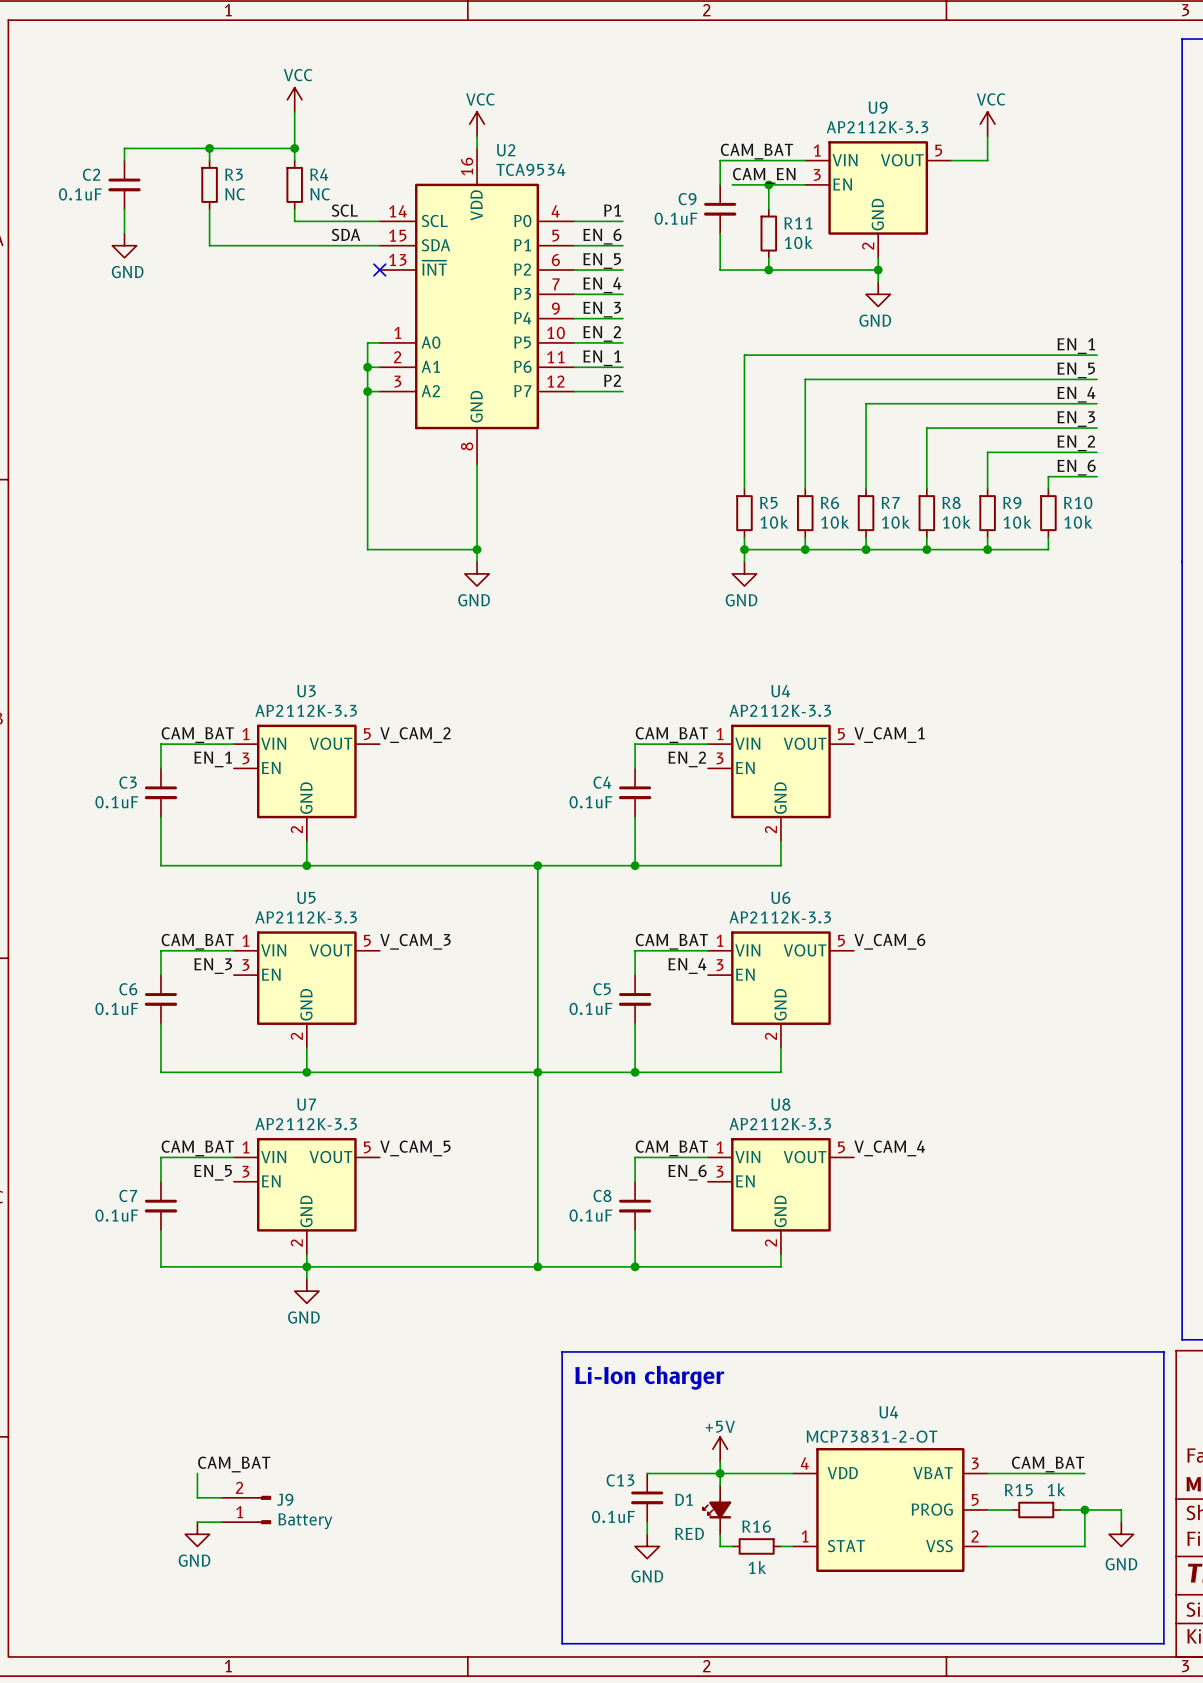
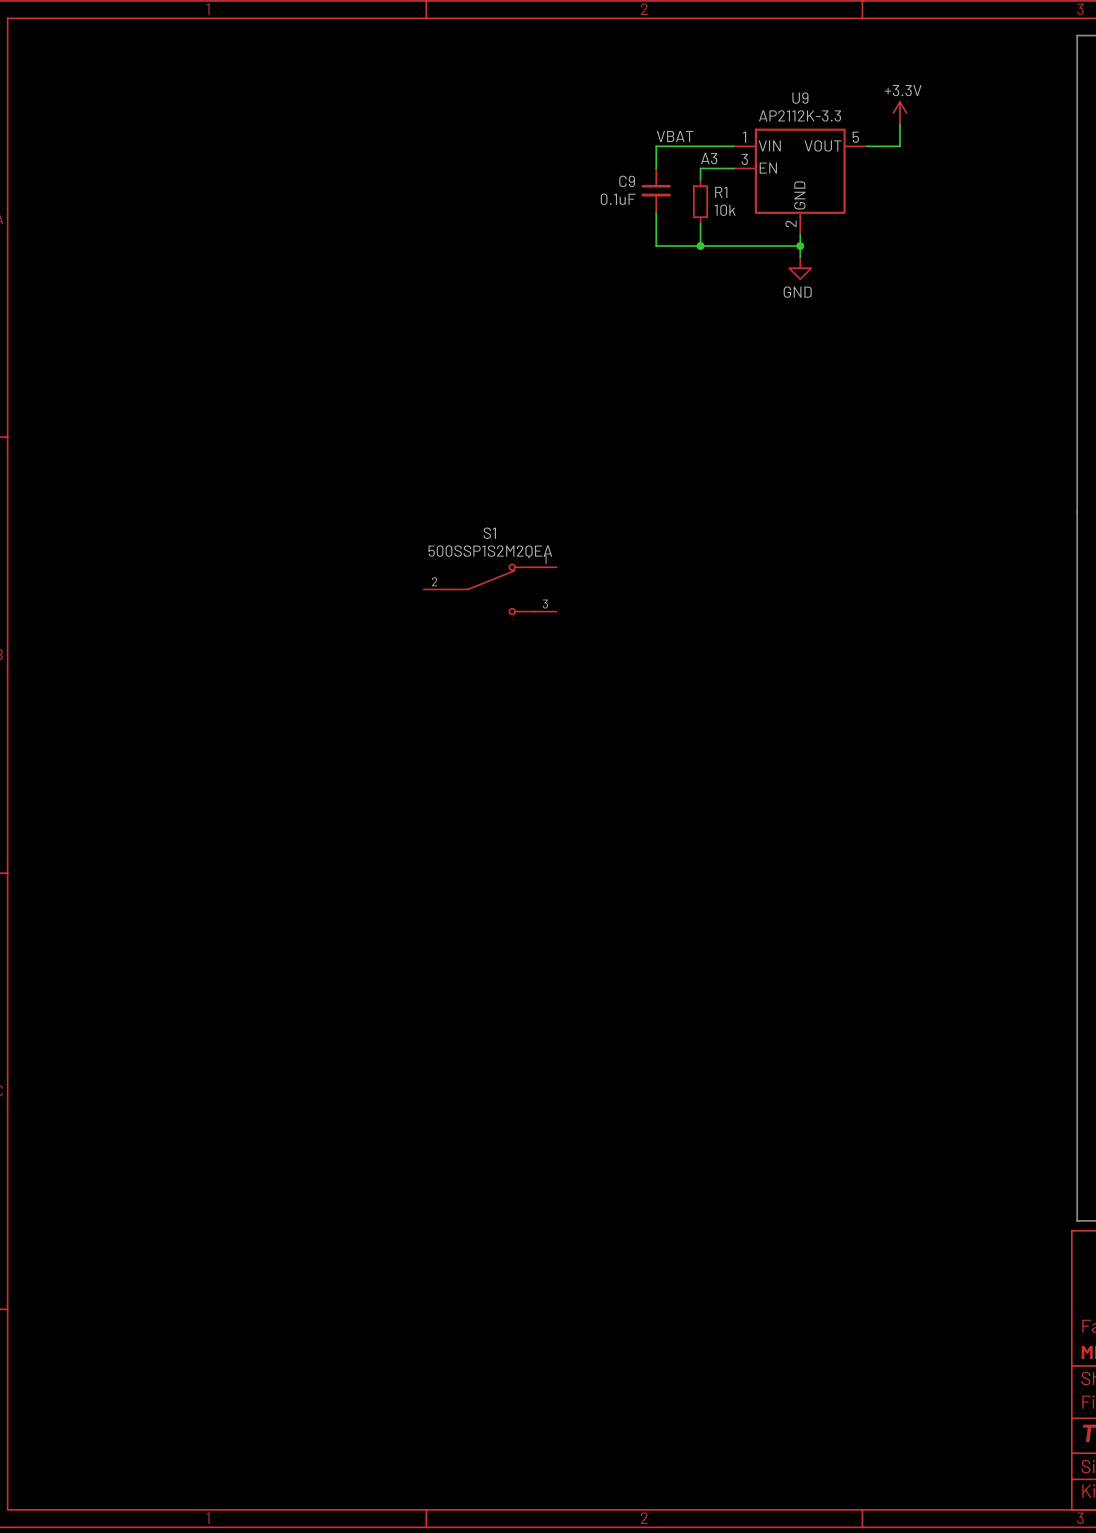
power symbol: VCC (294, 99) -> none
wire: (294, 111) (294, 160) -> none
power symbol: VCC (477, 124) -> none
power symbol: VCC (987, 124) -> +3.3V (899, 113)
wire: (477, 136) (477, 148) -> none
wire: (209, 148) (209, 160) -> none
junction: (209, 148) -> none
wire: (294, 148) (124, 148) (124, 160) -> none
junction: (294, 148) -> none
label: CAM_BAT (756, 151) -> VBAT (675, 136)
label: none -> A3 (709, 158)
label: CAM_EN (764, 175) -> none
C2: 0.1uF (124, 184) -> none
R3: NC (209, 184) -> none
R4: NC (294, 184) -> none
wire: (732, 184) (768, 184) -> none
junction: (768, 184) -> none
wire: (124, 209) (124, 233) -> none
wire: (209, 209) (209, 245) (379, 245) -> none
wire: (294, 209) (294, 221) (379, 221) -> none
label: SCL (344, 210) -> none
label: P1 (612, 210) -> none
wire: (574, 221) (622, 221) -> none
R1: none -> 10k (700, 201)
R11: 10k (768, 233) -> none
label: SDA (346, 234) -> none
label: EN_6 (602, 236) -> none
power symbol: GND (124, 245) -> none
wire: (574, 245) (622, 245) -> none
label: EN_5 (602, 260) -> none
no-connect mark: (379, 270) -> none
wire: (574, 270) (622, 270) -> none
label: EN_4 (602, 285) -> none
wire: (574, 294) (622, 294) -> none
U2: TCA9534 (477, 306) -> none
label: EN_3 (602, 309) -> none
wire: (574, 318) (622, 318) -> none
label: EN_2 (602, 333) -> none
wire: (379, 342) (367, 342) (367, 549) (477, 549) -> none
wire: (574, 342) (622, 342) -> none
label: EN_1 (1076, 346) -> none
wire: (1097, 355) (744, 355) (744, 488) -> none
label: EN_1 (602, 358) -> none
wire: (367, 367) (379, 367) -> none
junction: (367, 367) -> none
wire: (574, 367) (622, 367) -> none
label: EN_5 (1076, 370) -> none
wire: (1097, 379) (805, 379) (805, 488) -> none
label: P2 (612, 380) -> none
wire: (367, 391) (379, 391) -> none
junction: (367, 391) -> none
wire: (574, 391) (622, 391) -> none
label: EN_4 (1076, 394) -> none
wire: (1097, 403) (866, 403) (866, 488) -> none
label: EN_3 (1076, 419) -> none
wire: (1097, 428) (926, 428) (926, 488) -> none
label: EN_2 (1076, 443) -> none
wire: (1097, 452) (987, 452) (987, 488) -> none
wire: (477, 464) (477, 561) -> none
label: EN_6 (1076, 467) -> none
wire: (1097, 476) (1048, 476) (1048, 488) -> none
R5: 10k (744, 513) -> none
R6: 10k (805, 513) -> none
R7: 10k (866, 513) -> none
R8: 10k (926, 513) -> none
R9: 10k (987, 513) -> none
R10: 10k (1048, 513) -> none
wire: (744, 537) (744, 561) -> none
wire: (805, 537) (805, 549) -> none
wire: (866, 537) (866, 549) -> none
wire: (926, 537) (926, 549) -> none
wire: (987, 537) (987, 549) -> none
wire: (1048, 537) (1048, 549) (744, 549) -> none
junction: (477, 549) -> none
junction: (744, 549) -> none
junction: (805, 549) -> none
junction: (866, 549) -> none
junction: (926, 549) -> none
junction: (987, 549) -> none
power symbol: GND (477, 573) -> none
power symbol: GND (744, 573) -> none
S1: none -> 500SSP1S2M2QEA (490, 589)
label: CAM_BAT (197, 735) -> none
label: V_CAM_2 (415, 735) -> none
label: CAM_BAT (671, 735) -> none
label: V_CAM_1 (889, 735) -> none
wire: (233, 744) (160, 744) (160, 768) -> none
wire: (708, 744) (635, 744) (635, 768) -> none
label: EN_1 (213, 759) -> none
label: EN_2 (687, 759) -> none
U3: AP2112K-3.3 (306, 783) -> none
U4: AP2112K-3.3 (780, 783) -> none
C3: 0.1uF (160, 792) -> none
C4: 0.1uF (635, 792) -> none
wire: (160, 817) (160, 865) (780, 865) (780, 841) -> none
wire: (635, 817) (635, 865) -> none
wire: (306, 841) (306, 865) -> none
junction: (306, 865) -> none
wire: (537, 865) (537, 1266) -> none
junction: (537, 865) -> none
junction: (635, 865) -> none
label: CAM_BAT (197, 941) -> none
label: V_CAM_3 (415, 941) -> none
label: CAM_BAT (671, 941) -> none
label: V_CAM_6 (889, 941) -> none
wire: (233, 950) (160, 950) (160, 975) -> none
wire: (708, 950) (635, 950) (635, 975) -> none
label: EN_3 (213, 966) -> none
label: EN_4 (687, 966) -> none
U5: AP2112K-3.3 (306, 989) -> none
U6: AP2112K-3.3 (780, 989) -> none
C6: 0.1uF (160, 999) -> none
C5: 0.1uF (635, 999) -> none
wire: (160, 1023) (160, 1072) (780, 1072) (780, 1048) -> none
wire: (635, 1023) (635, 1072) -> none
wire: (306, 1048) (306, 1072) -> none
junction: (306, 1072) -> none
junction: (537, 1072) -> none
junction: (635, 1072) -> none
label: CAM_BAT (197, 1148) -> none
label: V_CAM_5 (415, 1148) -> none
label: CAM_BAT (671, 1148) -> none
label: V_CAM_4 (889, 1148) -> none
wire: (233, 1157) (160, 1157) (160, 1181) -> none
wire: (708, 1157) (635, 1157) (635, 1181) -> none
label: EN_5 (213, 1172) -> none
label: EN_6 (687, 1172) -> none
U7: AP2112K-3.3 (306, 1196) -> none
U8: AP2112K-3.3 (780, 1196) -> none
C7: 0.1uF (160, 1206) -> none
C8: 0.1uF (635, 1206) -> none
wire: (160, 1230) (160, 1266) (780, 1266) (780, 1254) -> none
wire: (635, 1230) (635, 1266) -> none
wire: (306, 1254) (306, 1279) -> none
junction: (306, 1266) -> none
junction: (537, 1266) -> none
junction: (635, 1266) -> none
power symbol: GND (306, 1291) -> none
line: (562, 1351) (562, 1643) (1163, 1643) (1163, 1351) (562, 1351) -> none
text: Li-Ion charger (649, 1377) -> none
power symbol: +5V (720, 1449) -> none
wire: (720, 1461) (720, 1485) -> none
label: CAM_BAT (234, 1464) -> none
label: CAM_BAT (1048, 1464) -> none
wire: (197, 1473) (197, 1497) (221, 1497) -> none
wire: (647, 1473) (793, 1473) -> none
junction: (720, 1473) -> none
wire: (987, 1473) (1084, 1473) -> none
C13: 0.1uF (647, 1497) -> none
J9: Battery (246, 1509) -> none
D1: RED (717, 1509) -> none
U4: MCP73831-2-OT (890, 1509) -> none
wire: (987, 1509) (1011, 1509) -> none
R15: 1k (1036, 1509) -> none
wire: (1060, 1509) (1121, 1509) (1121, 1522) -> none
wire: (1084, 1509) (1084, 1546) (987, 1546) -> none
junction: (1084, 1509) -> none
wire: (197, 1522) (221, 1522) -> none
wire: (647, 1522) (647, 1534) -> none
power symbol: GND (197, 1534) -> none
wire: (720, 1534) (720, 1546) (732, 1546) -> none
power symbol: GND (1121, 1534) -> none
power symbol: GND (647, 1546) -> none
R16: 1k (756, 1546) -> none
wire: (780, 1546) (793, 1546) -> none

